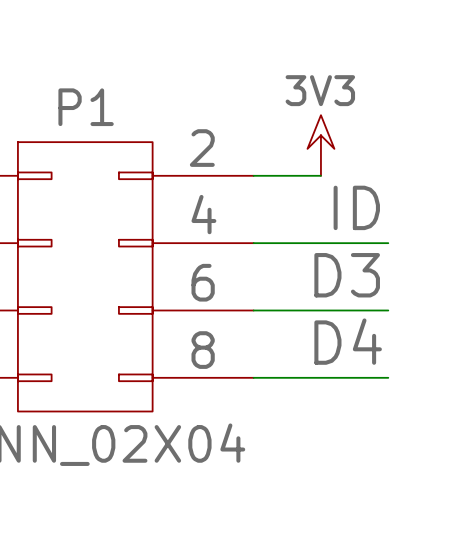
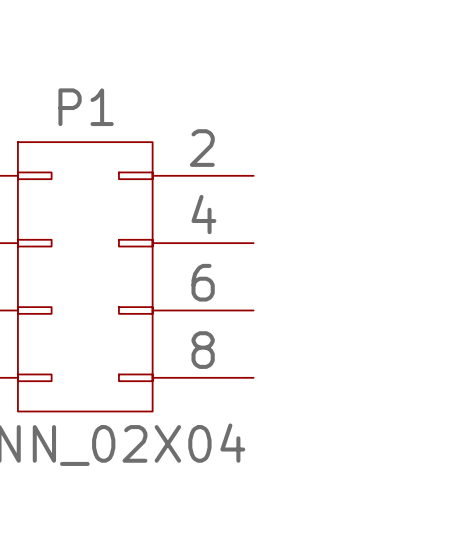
power symbol: 3V3 (320, 145) -> none
wire: (253, 175) (320, 175) -> none
label: ID (356, 207) -> none
wire: (253, 243) (388, 243) -> none
label: D3 (347, 275) -> none
wire: (253, 310) (388, 310) -> none
label: D4 (348, 341) -> none
wire: (253, 377) (388, 377) -> none

